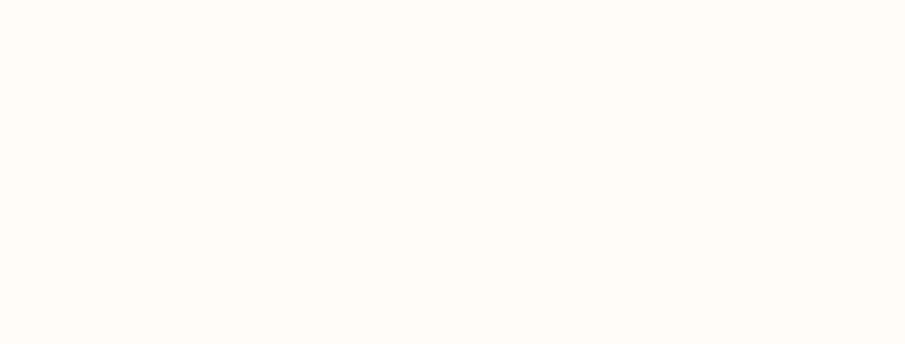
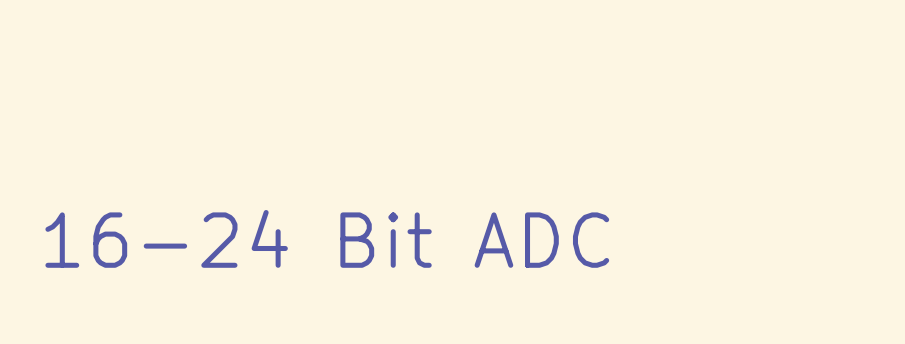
text: none -> 16-24 Bit ADC (327, 238)

